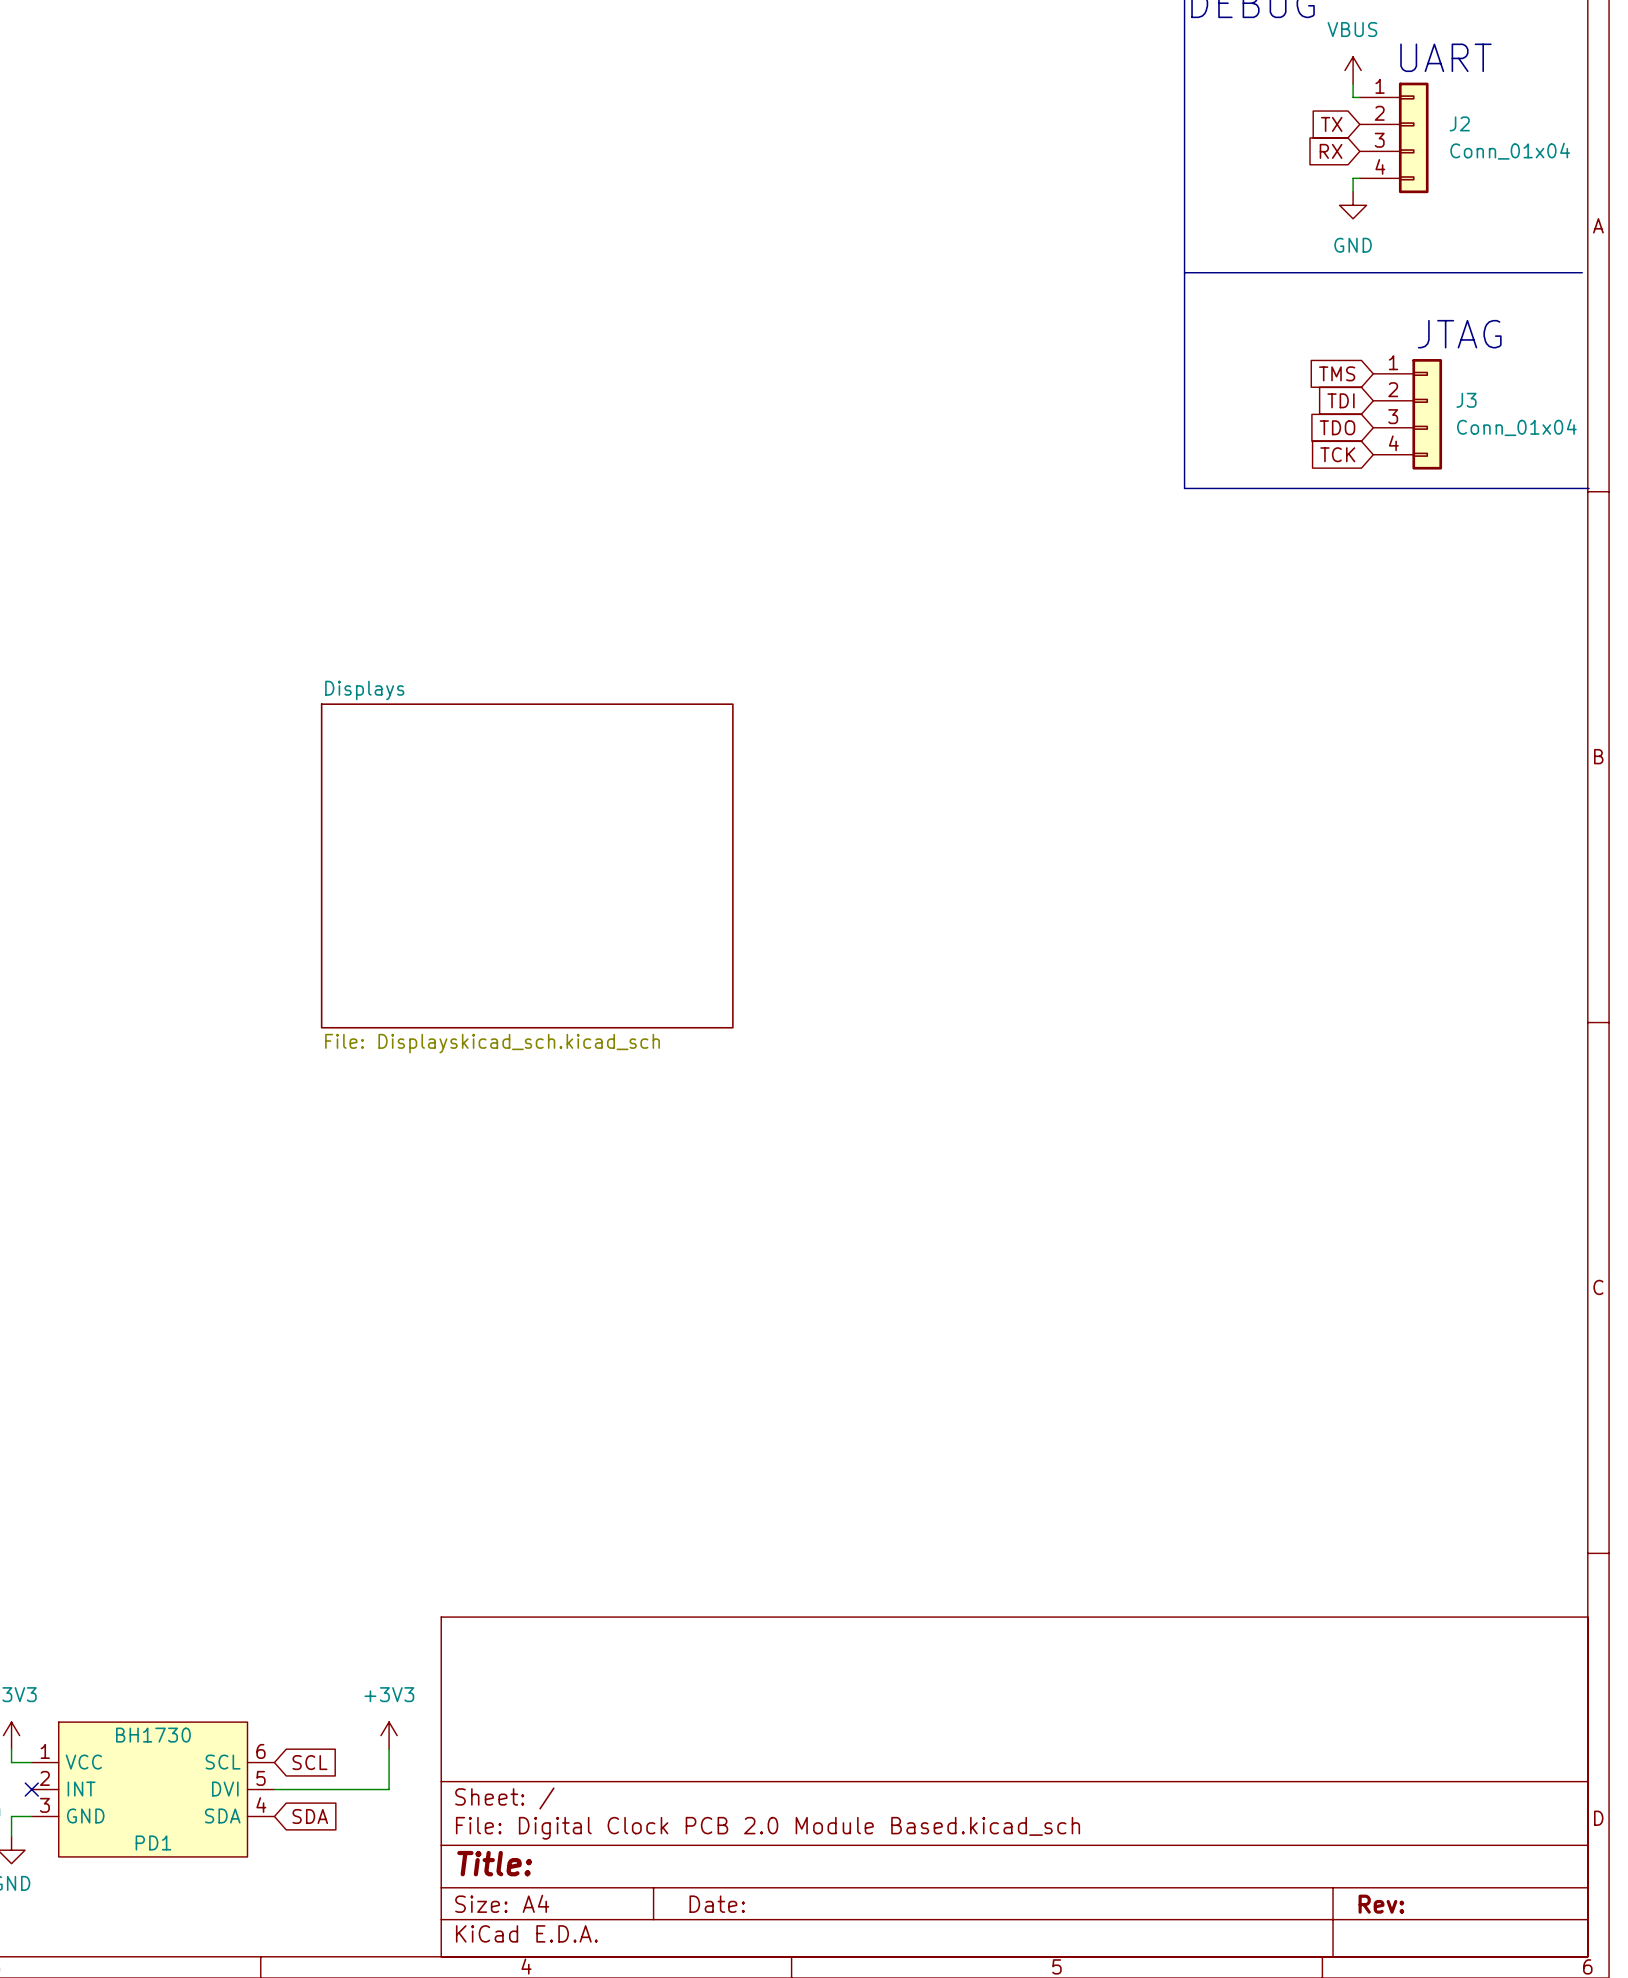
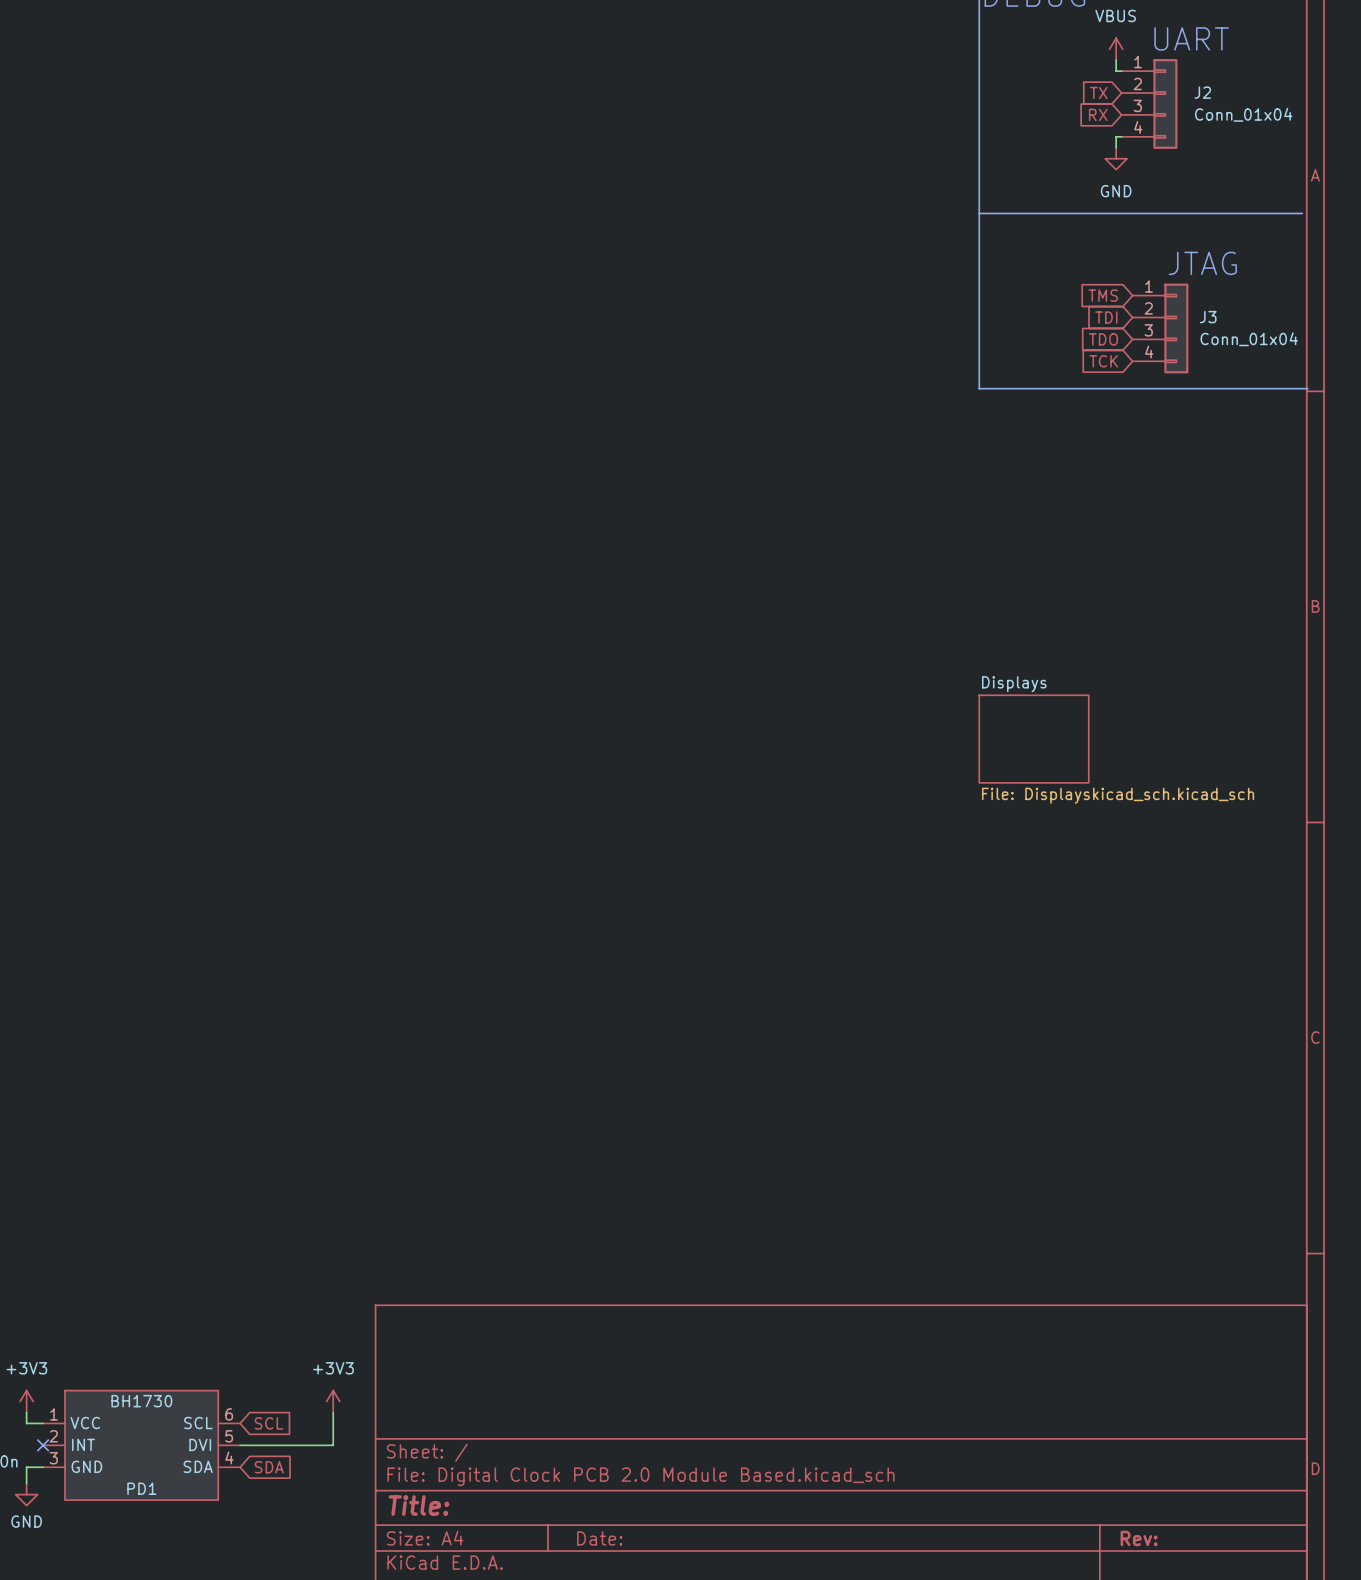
sheet Displays: File: Displayskicad_sch.kicad_sch (527, 865) -> none
sheet Displays: none -> File: Displayskicad_sch.kicad_sch (1034, 739)

